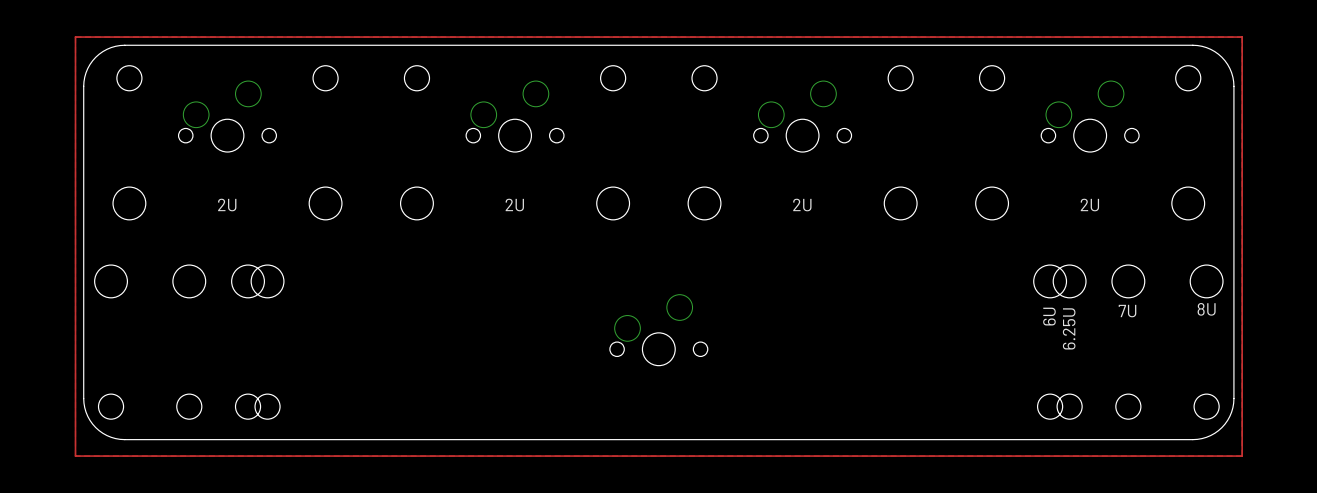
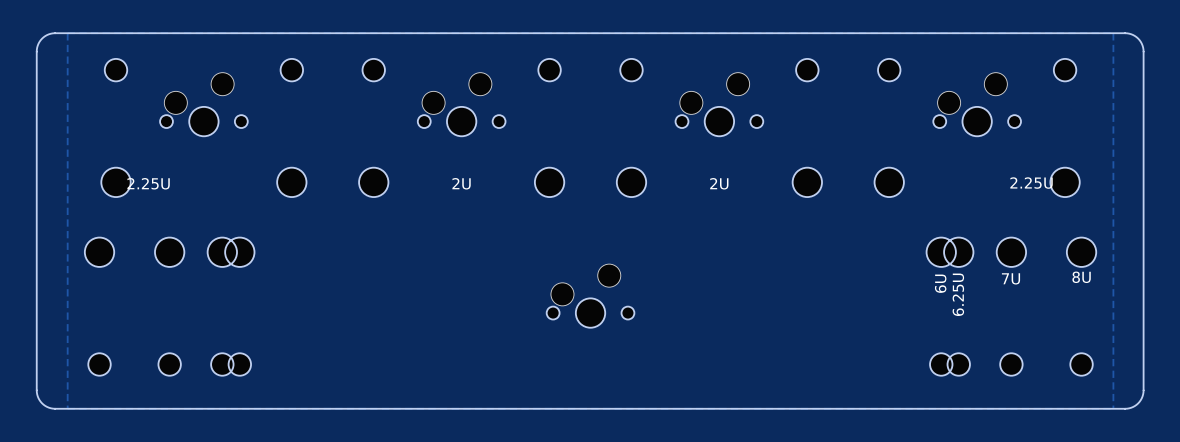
track: (75, 37) (1242, 37) (1242, 456) (75, 456) (75, 37) -> none
board edge: (124, 45) (1192, 45) (1206, 47) (1218, 54) (1224, 60) (1231, 72) (1233, 81) (1233, 398) (1231, 412) (1227, 420) (1218, 430) (1206, 437) (1192, 439) (124, 439) (111, 437) (102, 433) (92, 424) (87, 416) (83, 403) (83, 86) (87, 68) (95, 57) (106, 49) (124, 45) -> (55, 33) (42, 38) (36, 51) (36, 390) (40, 401) (49, 407) (1125, 408) (1136, 404) (1142, 396) (1143, 51) (1140, 41) (1131, 34) (55, 33)
text: none -> 2.25U (1031, 183)
text: none -> 2.25U (148, 183)
text: 2U (227, 205) -> none
text: 2U (1089, 205) -> none

